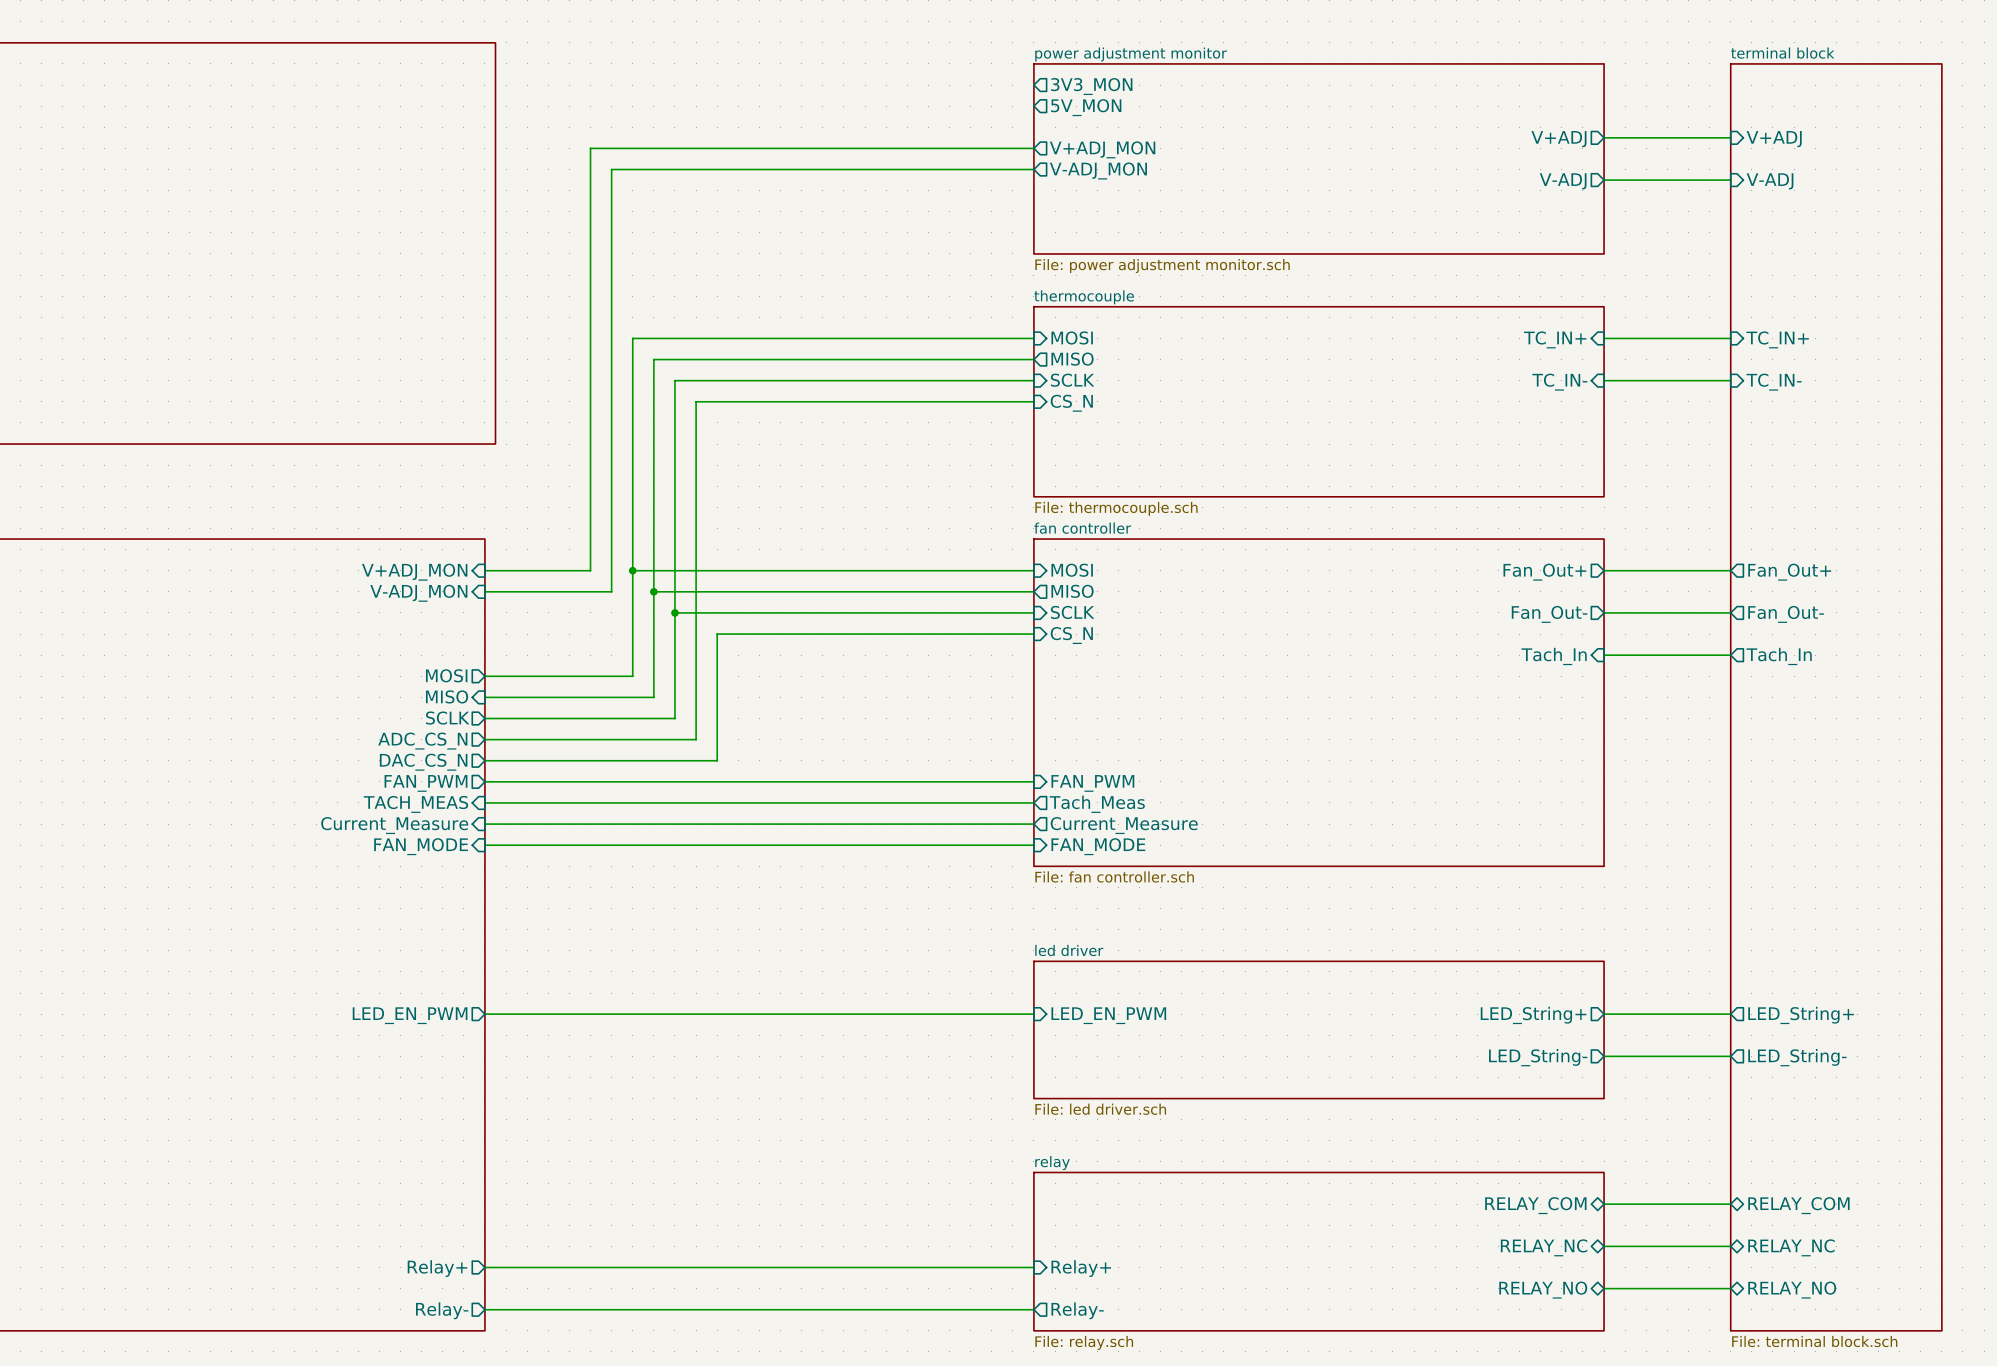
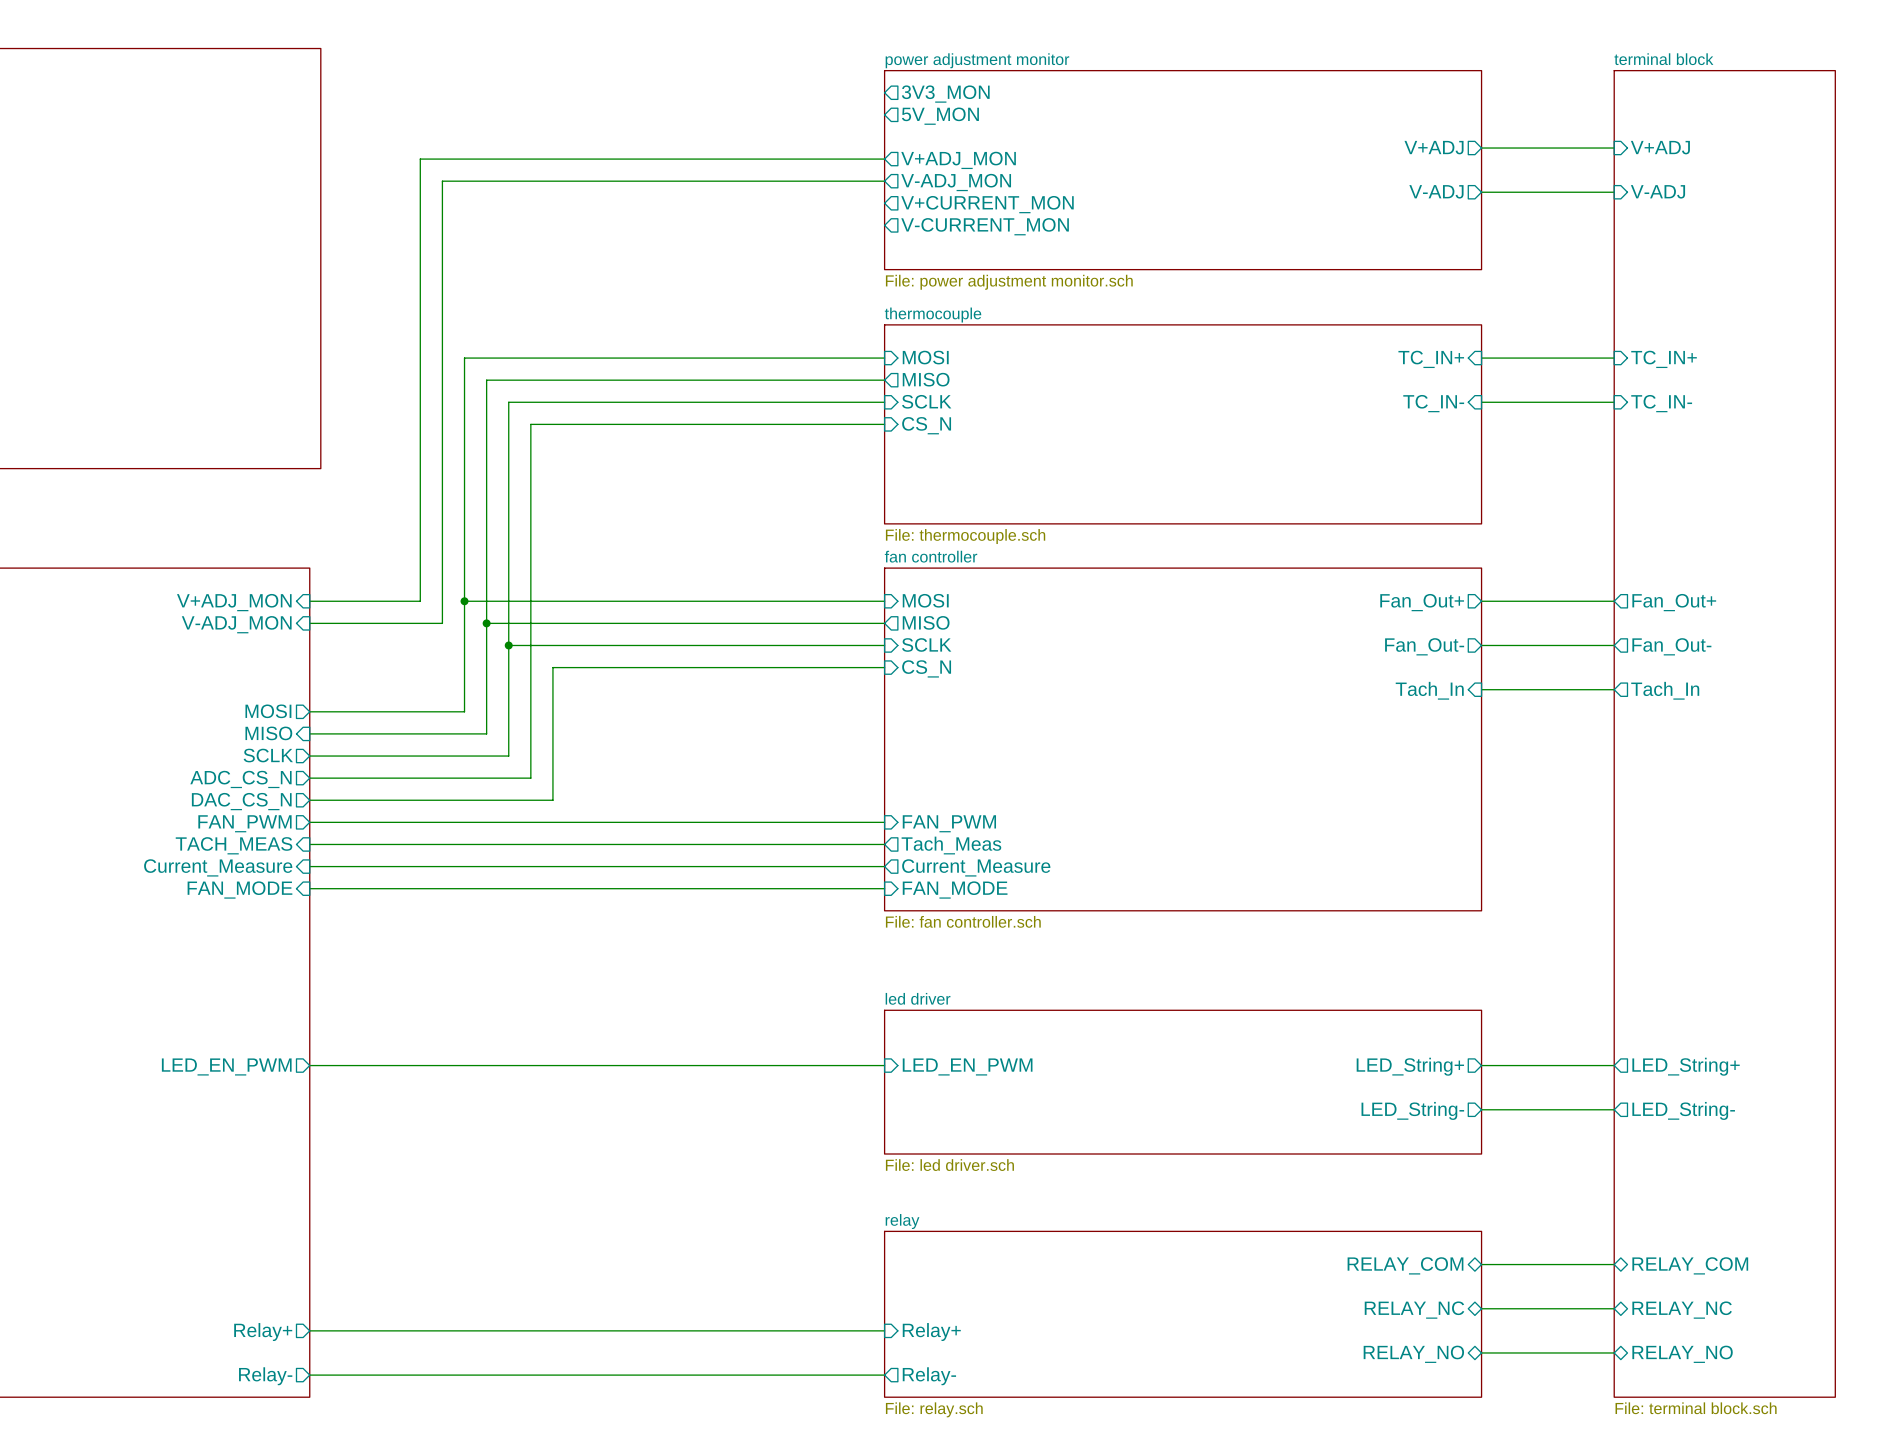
sheet pin: none -> V+CURRENT_MON (987, 204)
sheet pin: none -> V-CURRENT_MON (985, 226)

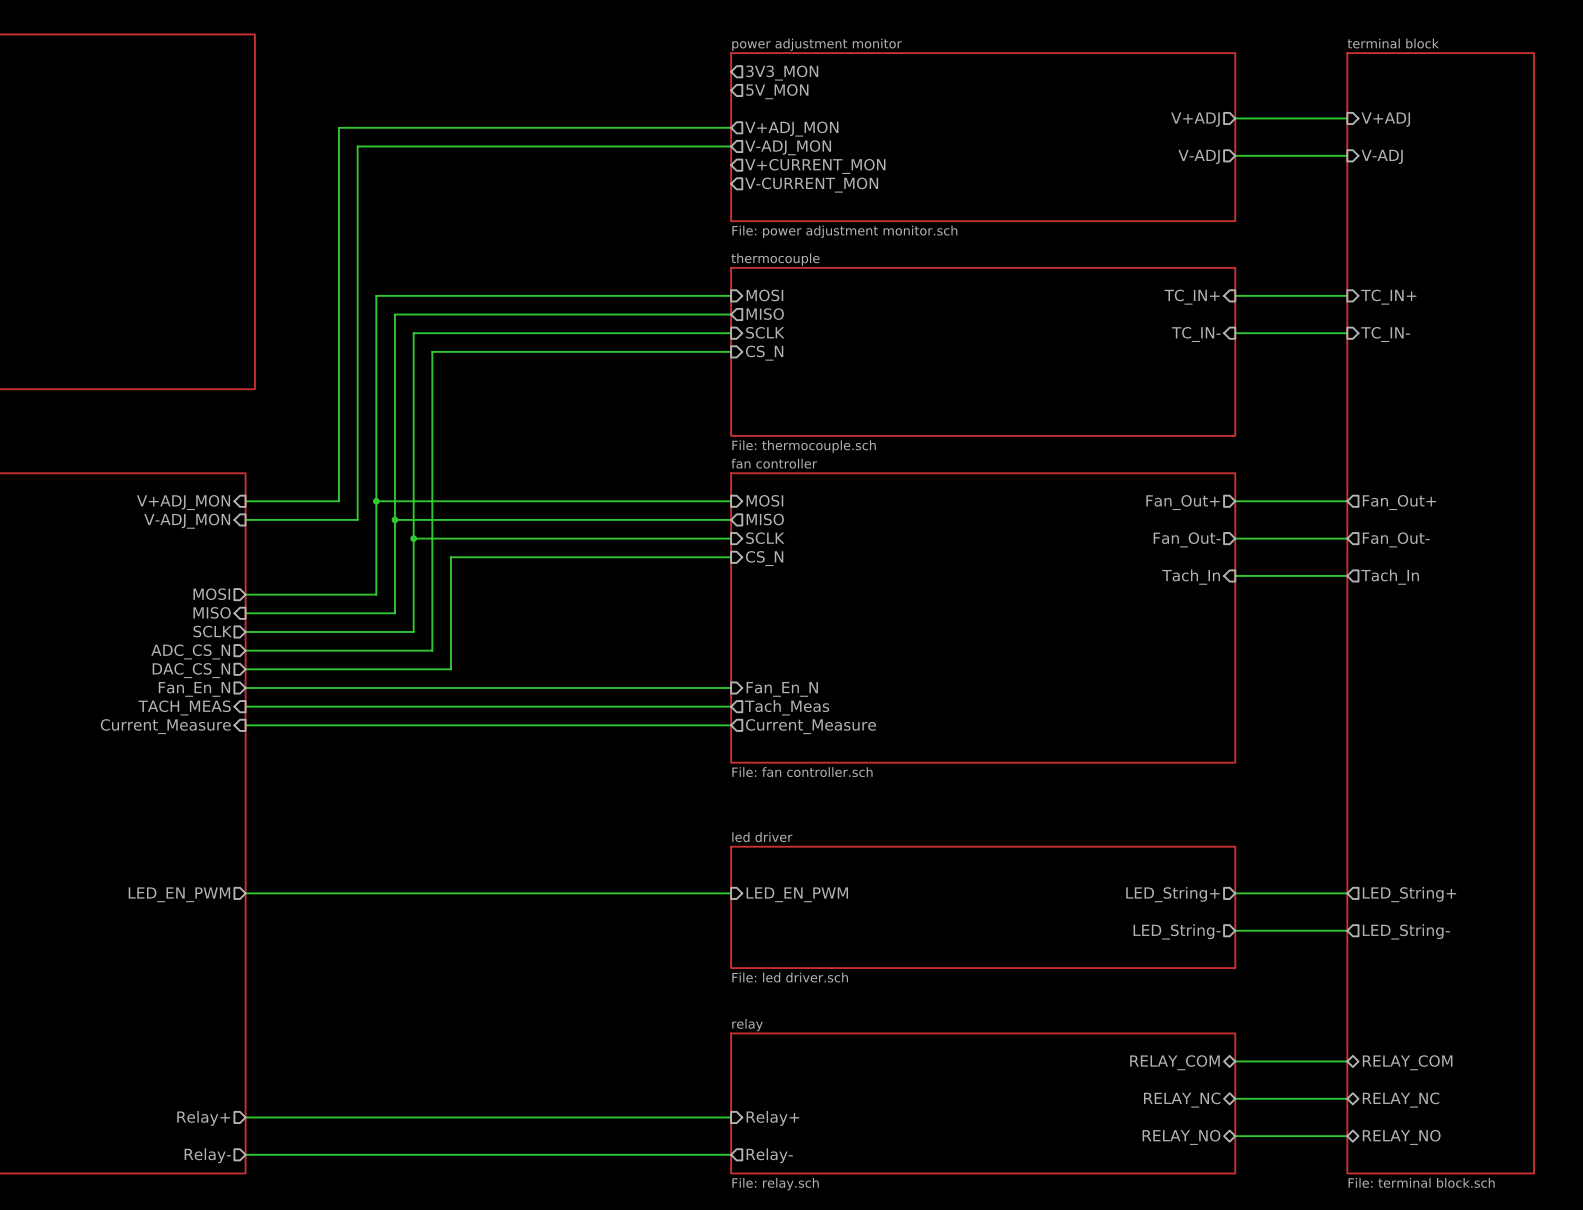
sheet pin: FAN_PWM (244, 823) -> Fan_En_N (194, 689)
sheet pin: FAN_PWM (949, 823) -> Fan_En_N (782, 689)
wire: (309, 888) (884, 888) -> none
sheet pin: FAN_MODE (239, 890) -> none
sheet pin: FAN_MODE (955, 890) -> none

